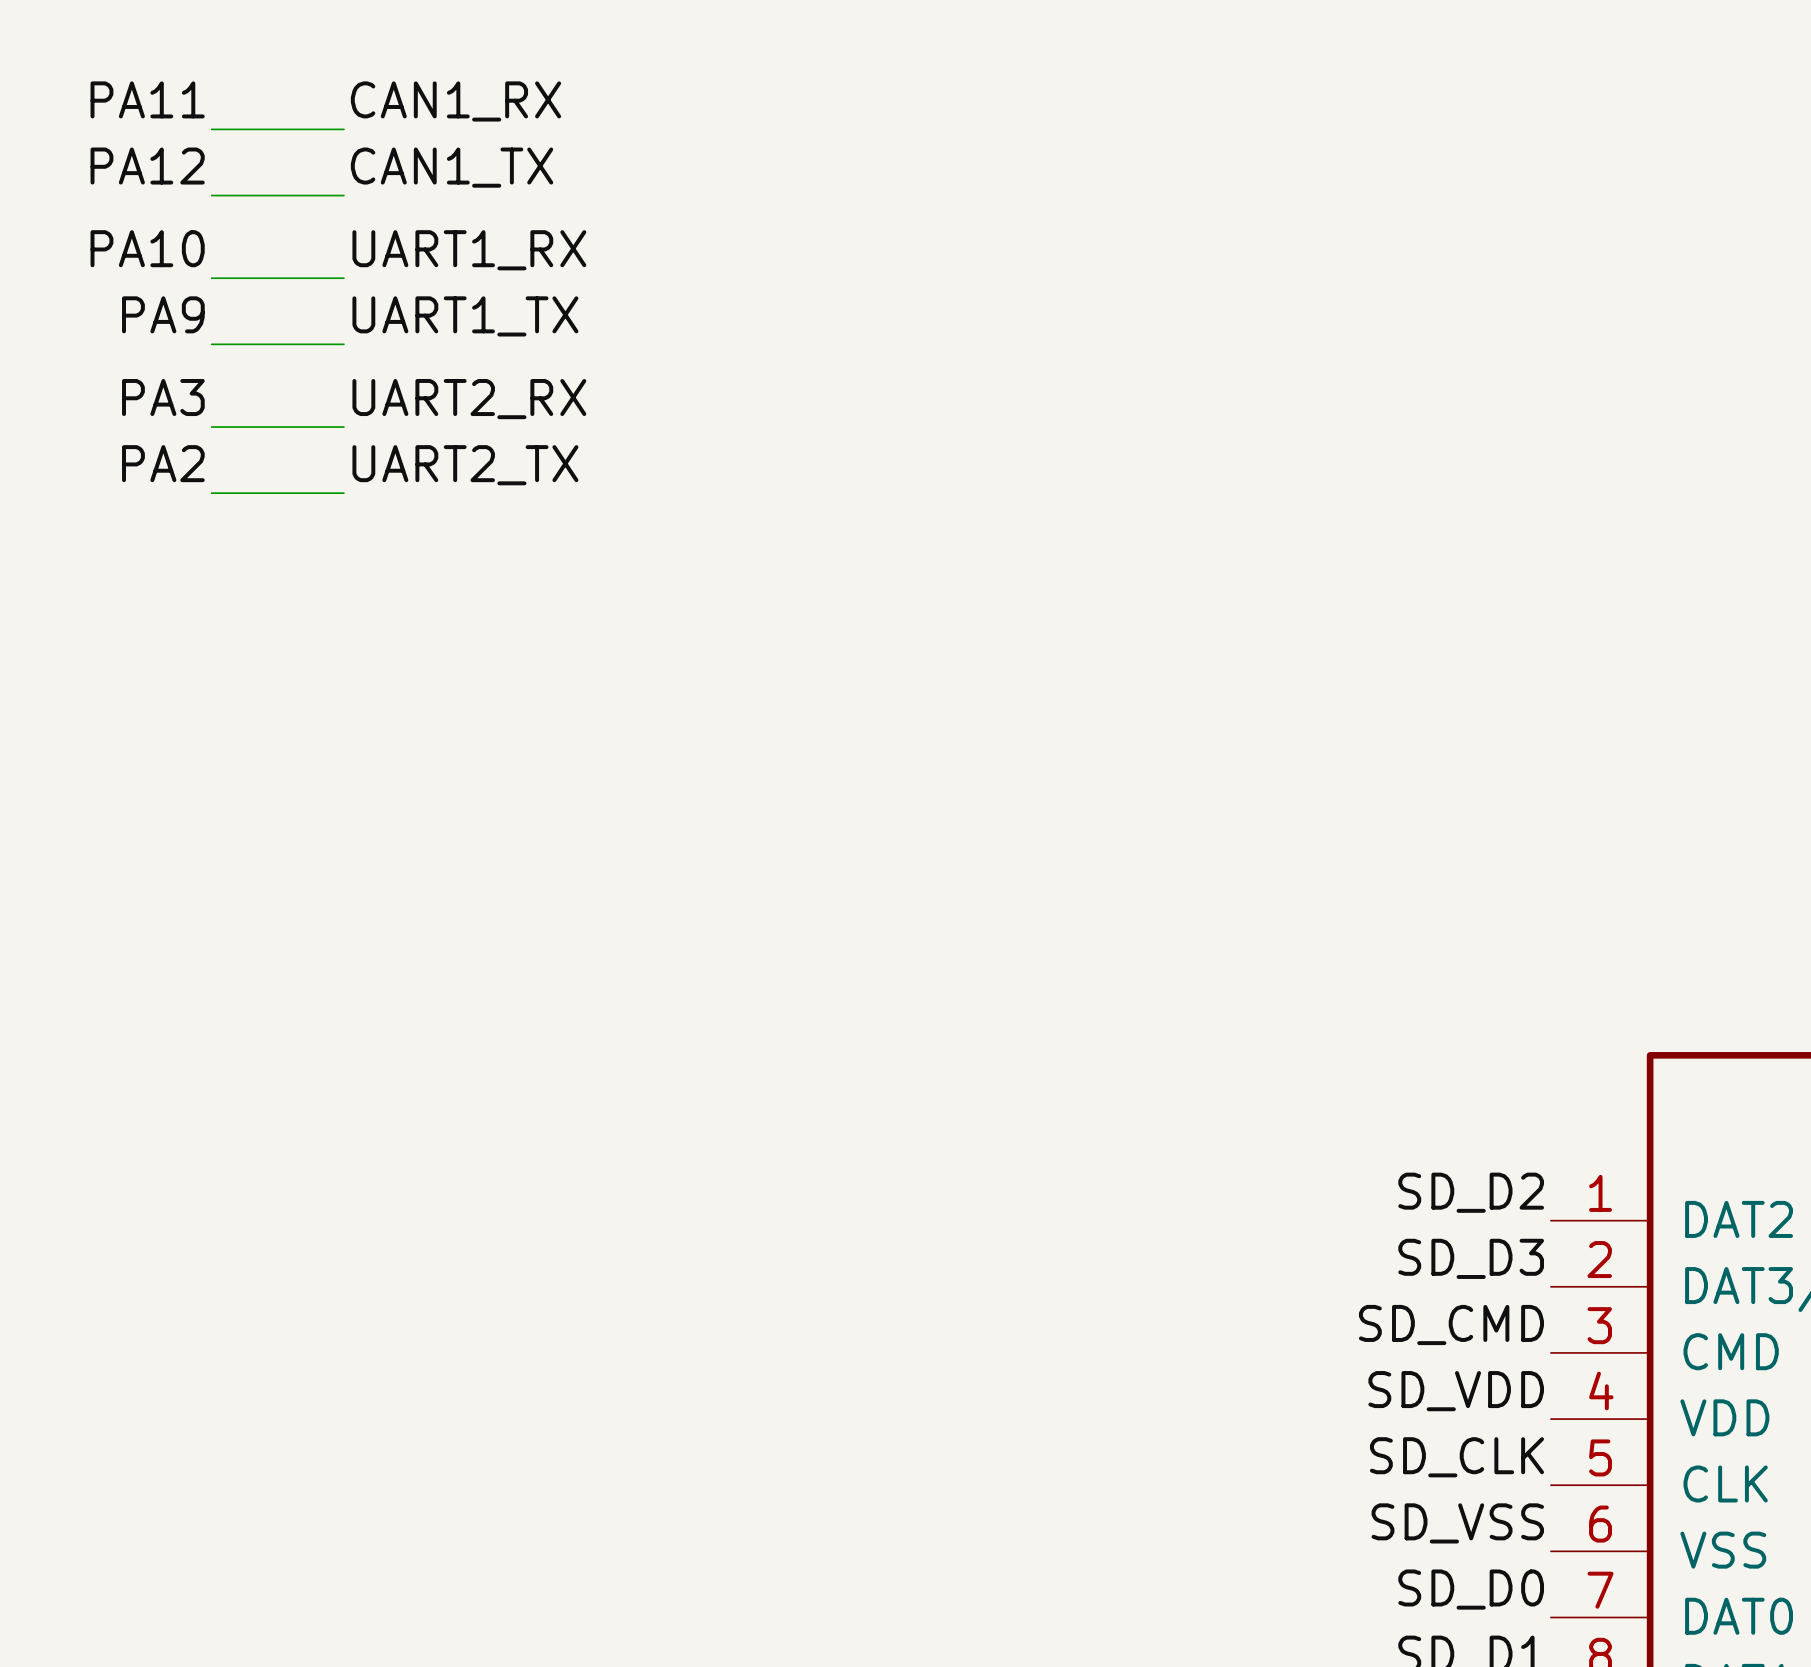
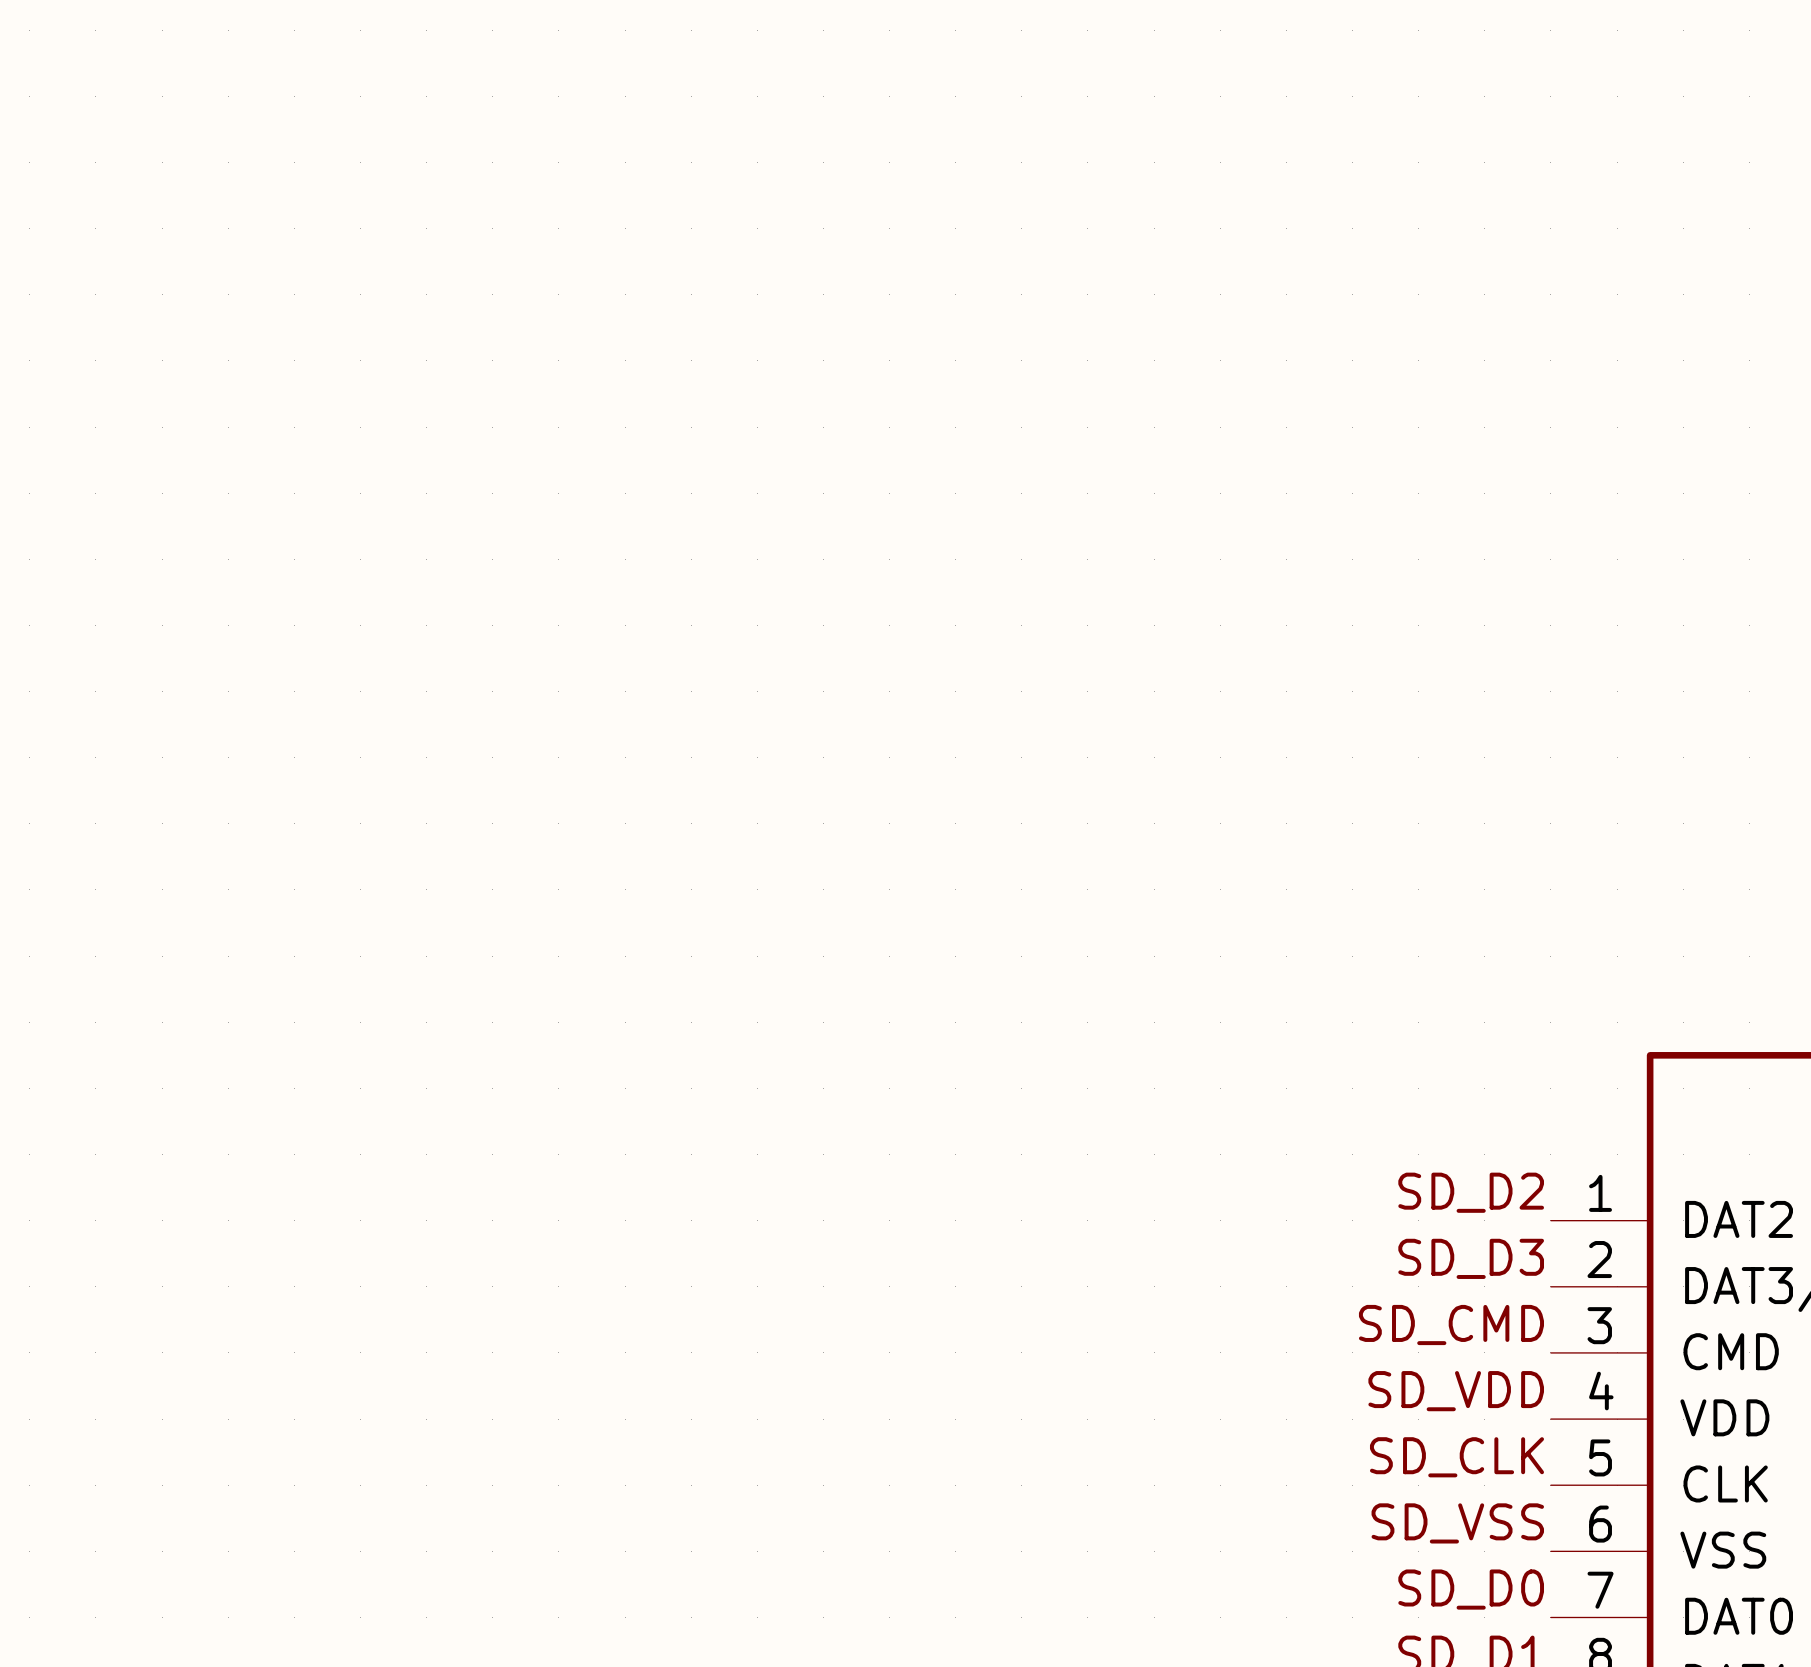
label: PA11 (147, 99) -> none
label: CAN1_RX (455, 101) -> none
wire: (211, 129) (343, 129) -> none
label: PA12 (147, 166) -> none
label: CAN1_TX (452, 167) -> none
wire: (211, 195) (343, 195) -> none
label: PA10 (147, 248) -> none
label: UART1_RX (469, 250) -> none
wire: (211, 278) (343, 278) -> none
label: PA9 (163, 314) -> none
label: UART1_TX (465, 316) -> none
wire: (211, 344) (343, 344) -> none
label: PA3 (163, 397) -> none
label: UART2_RX (469, 399) -> none
wire: (211, 427) (343, 427) -> none
label: PA2 (163, 463) -> none
label: UART2_TX (465, 465) -> none
wire: (211, 493) (343, 493) -> none

